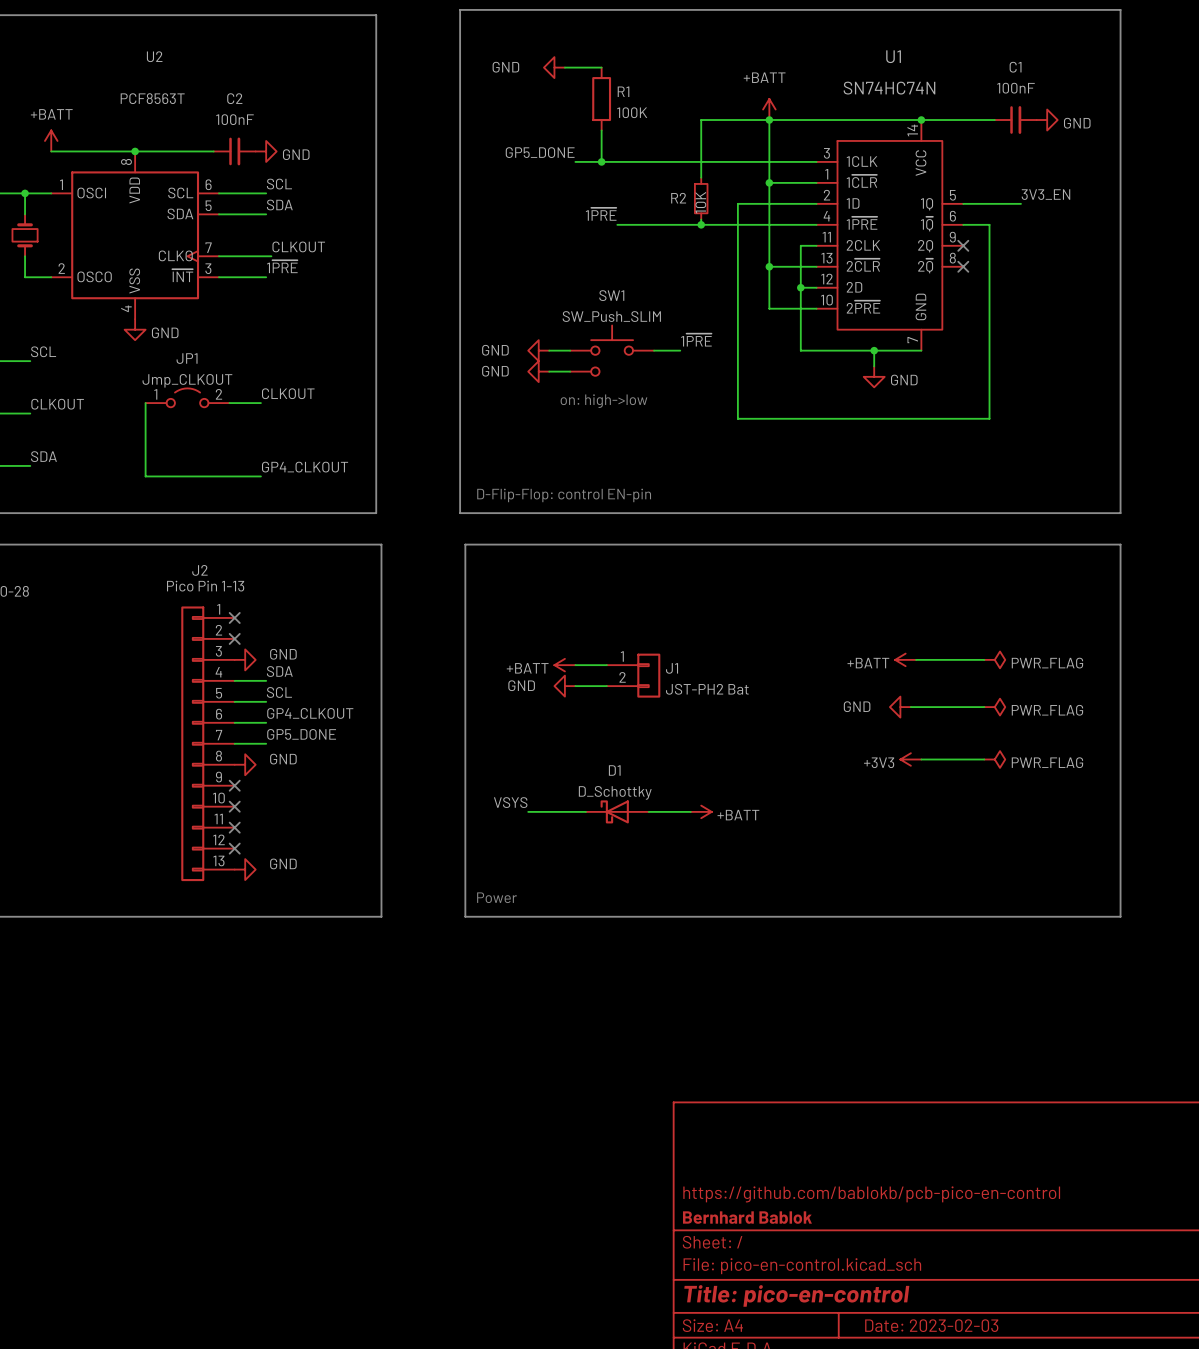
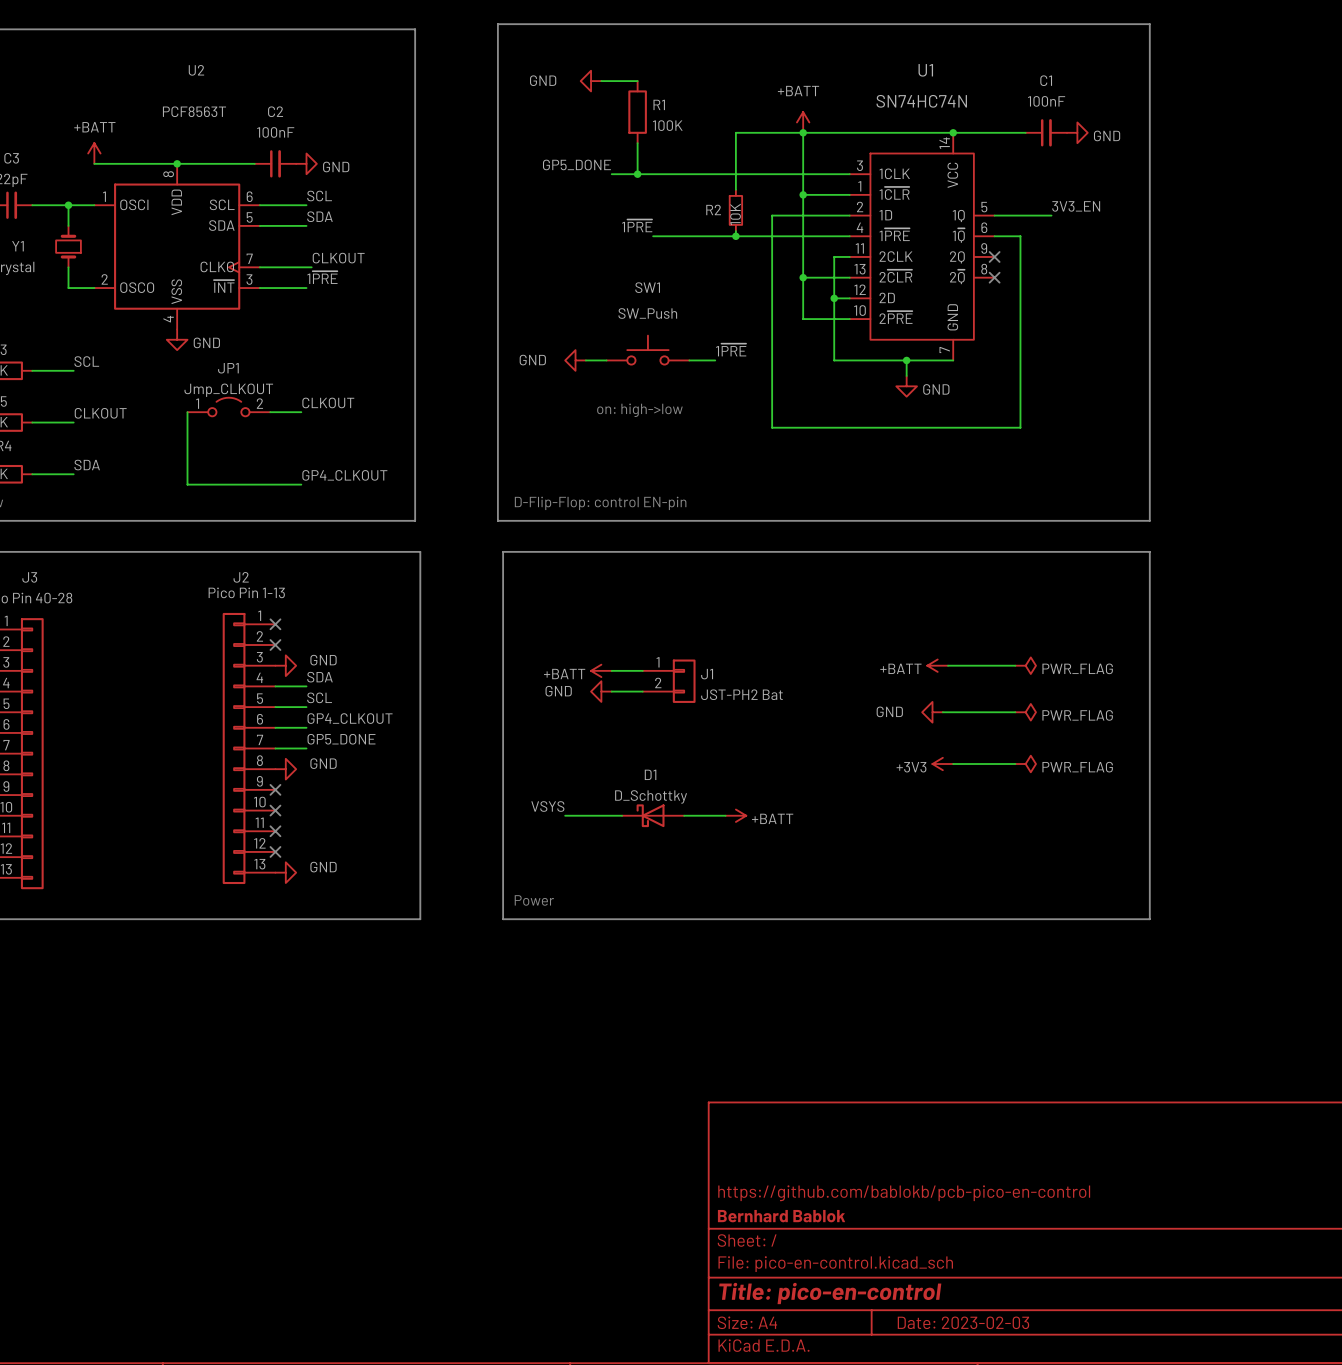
SW1 value: SW_Push_SLIM (611, 316) -> SW_Push (647, 313)
SW1 symbol: [570, 325, 655, 376] -> [606, 335, 690, 365]
power symbol: GND (538, 371) -> none
wire: (549, 371) (570, 371) -> none

